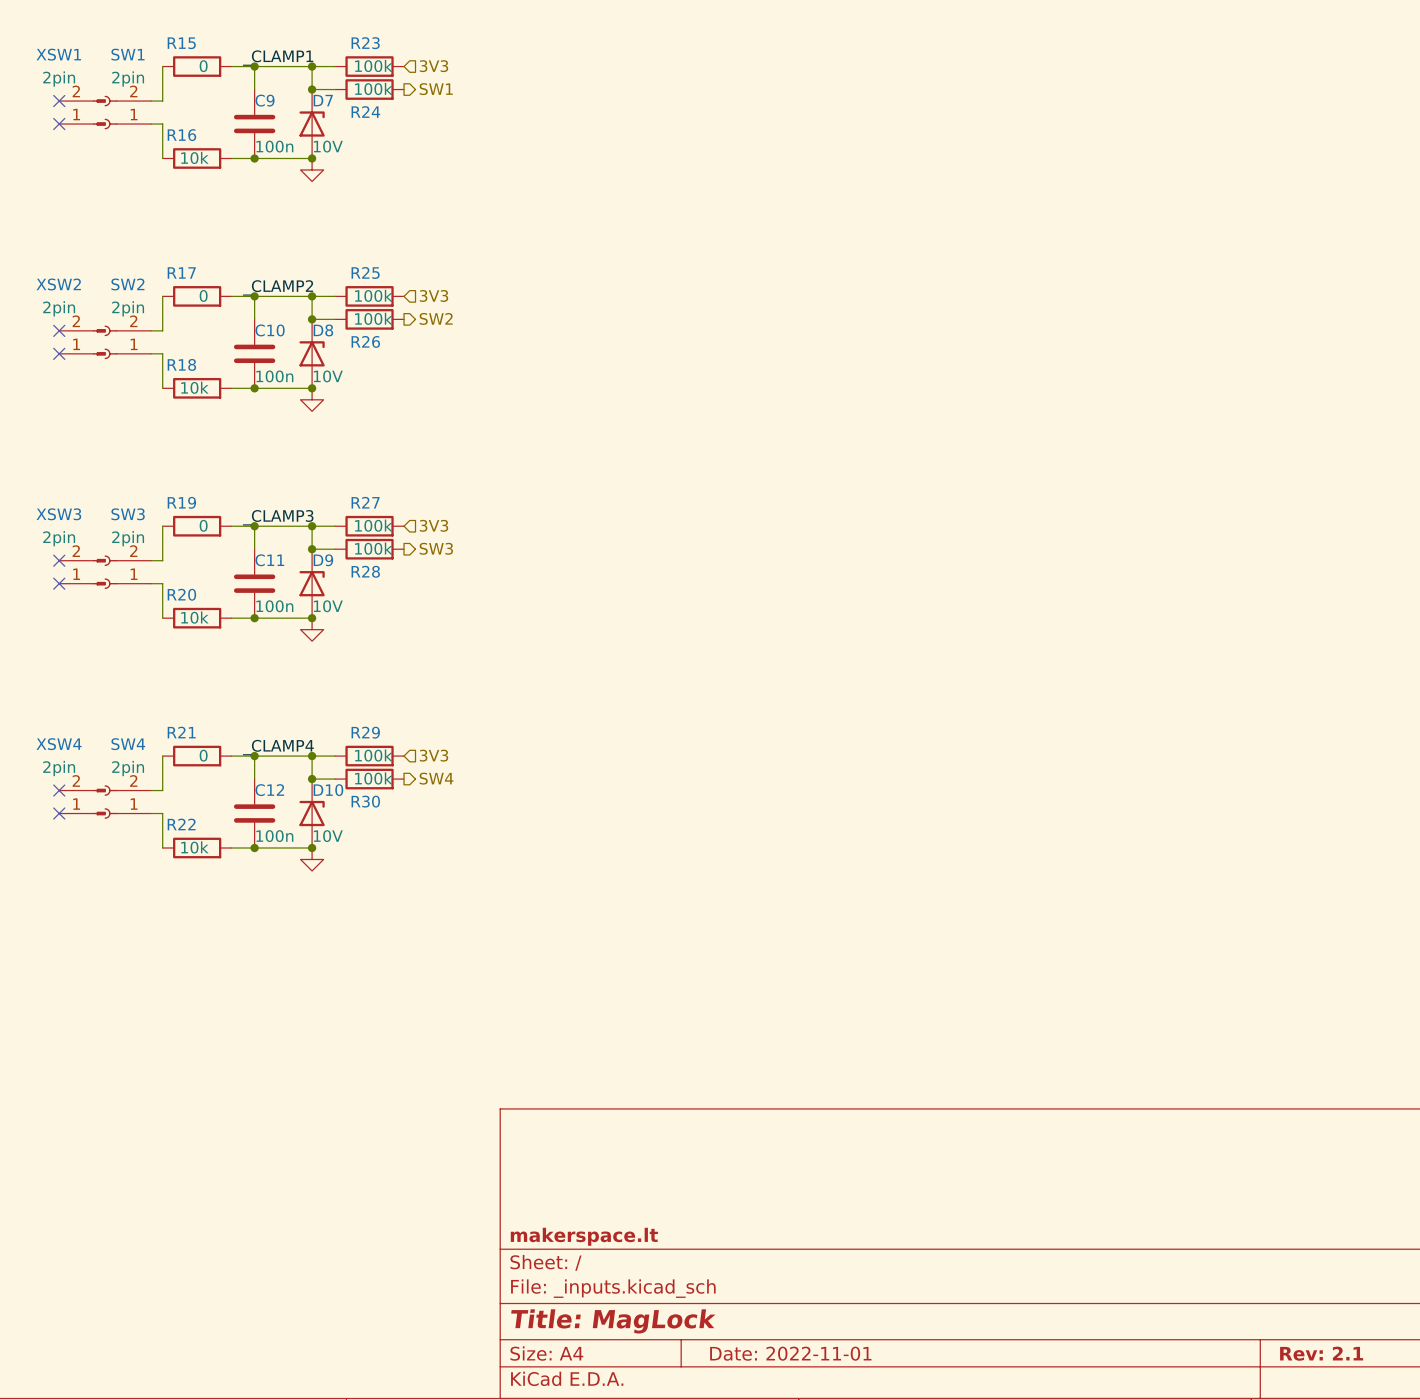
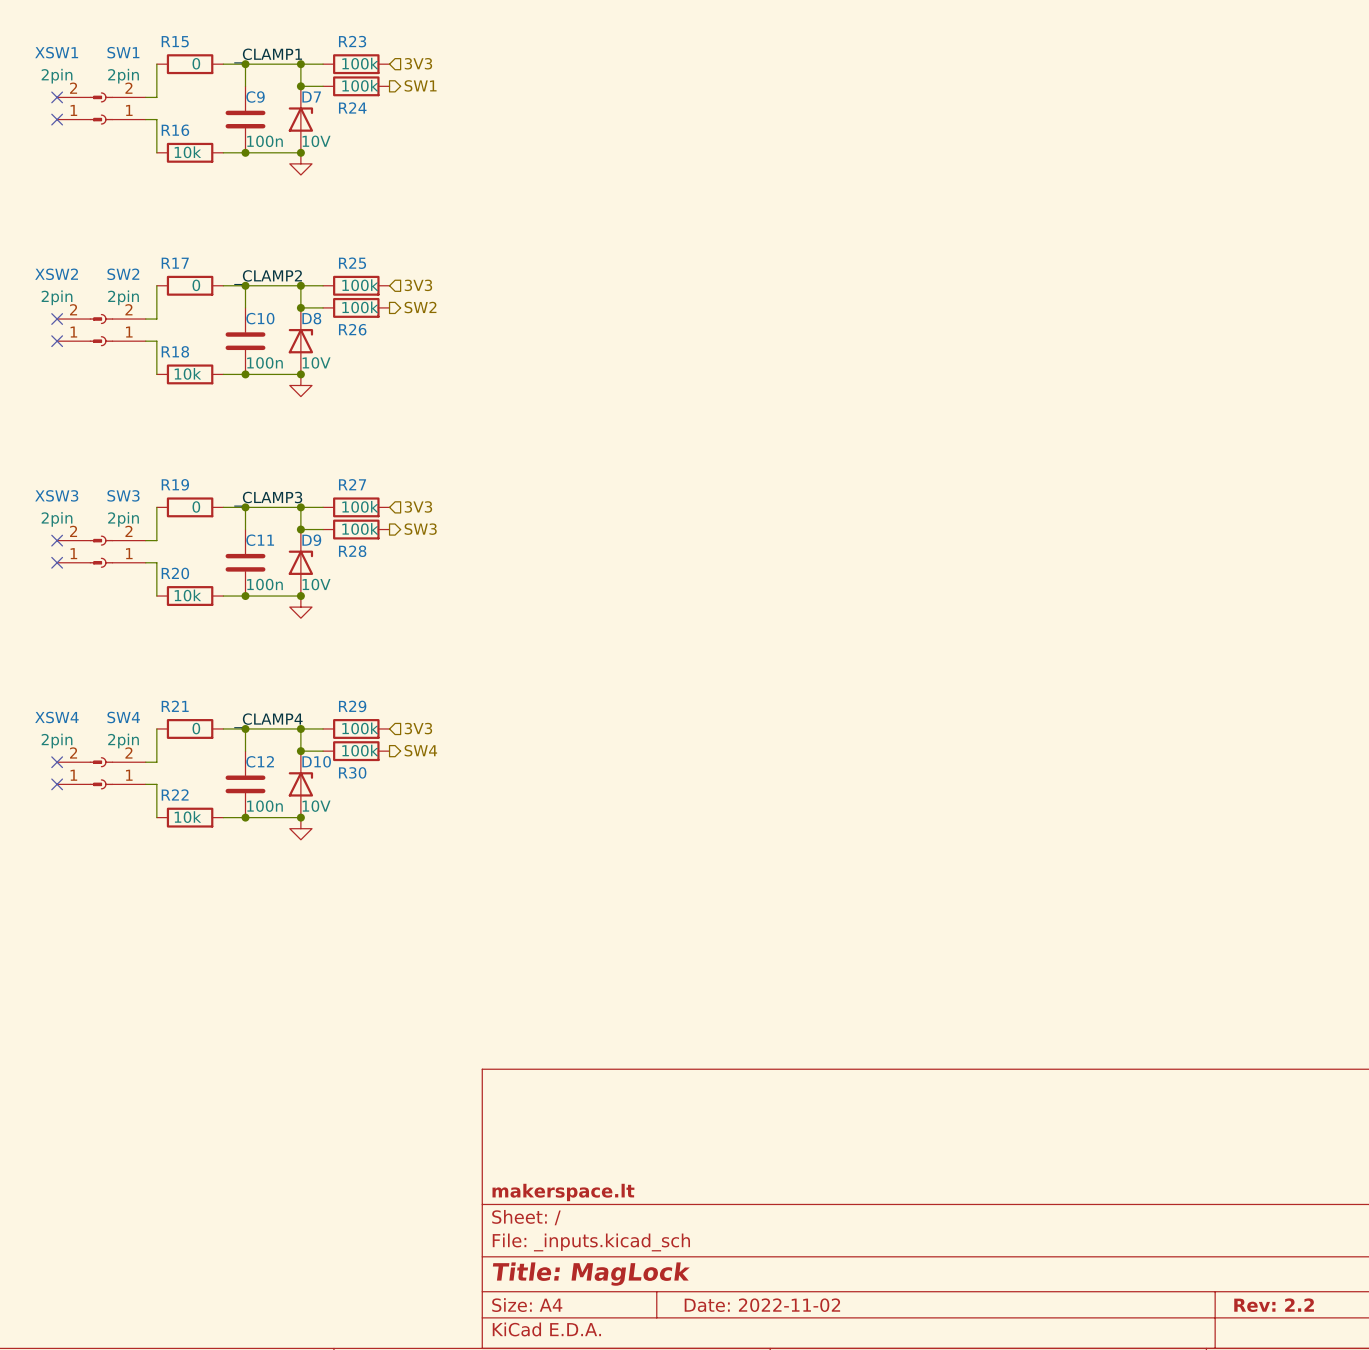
title block: Date: 2022-11-01 (790, 1353) -> Date: 2022-11-02 (762, 1305)
title block: Rev: 2.1 (1321, 1353) -> Rev: 2.2 (1274, 1305)

